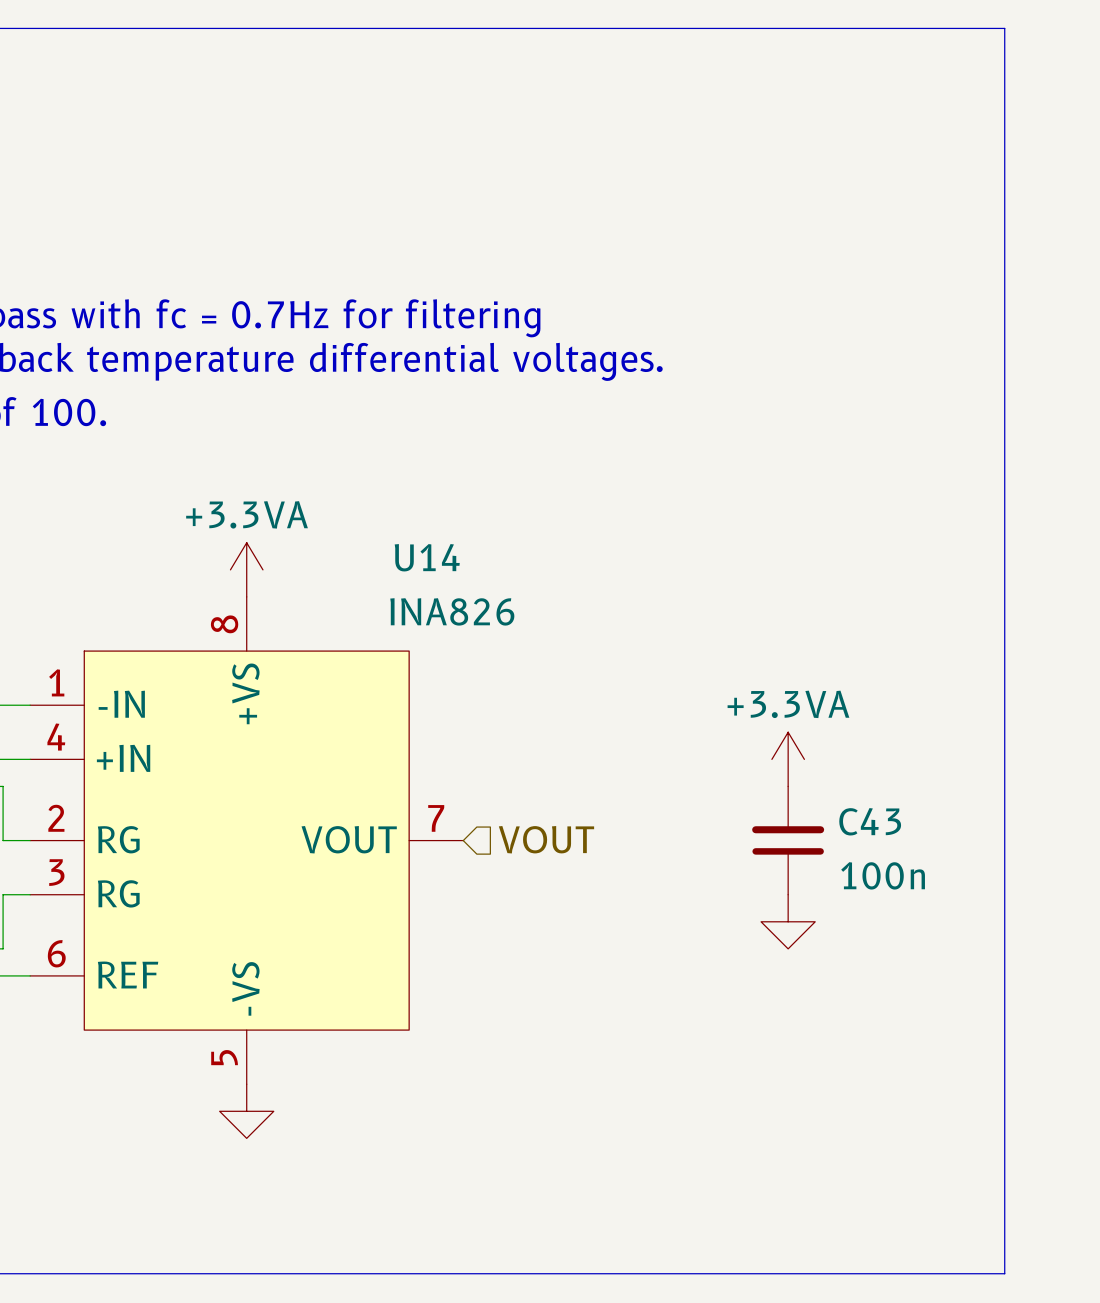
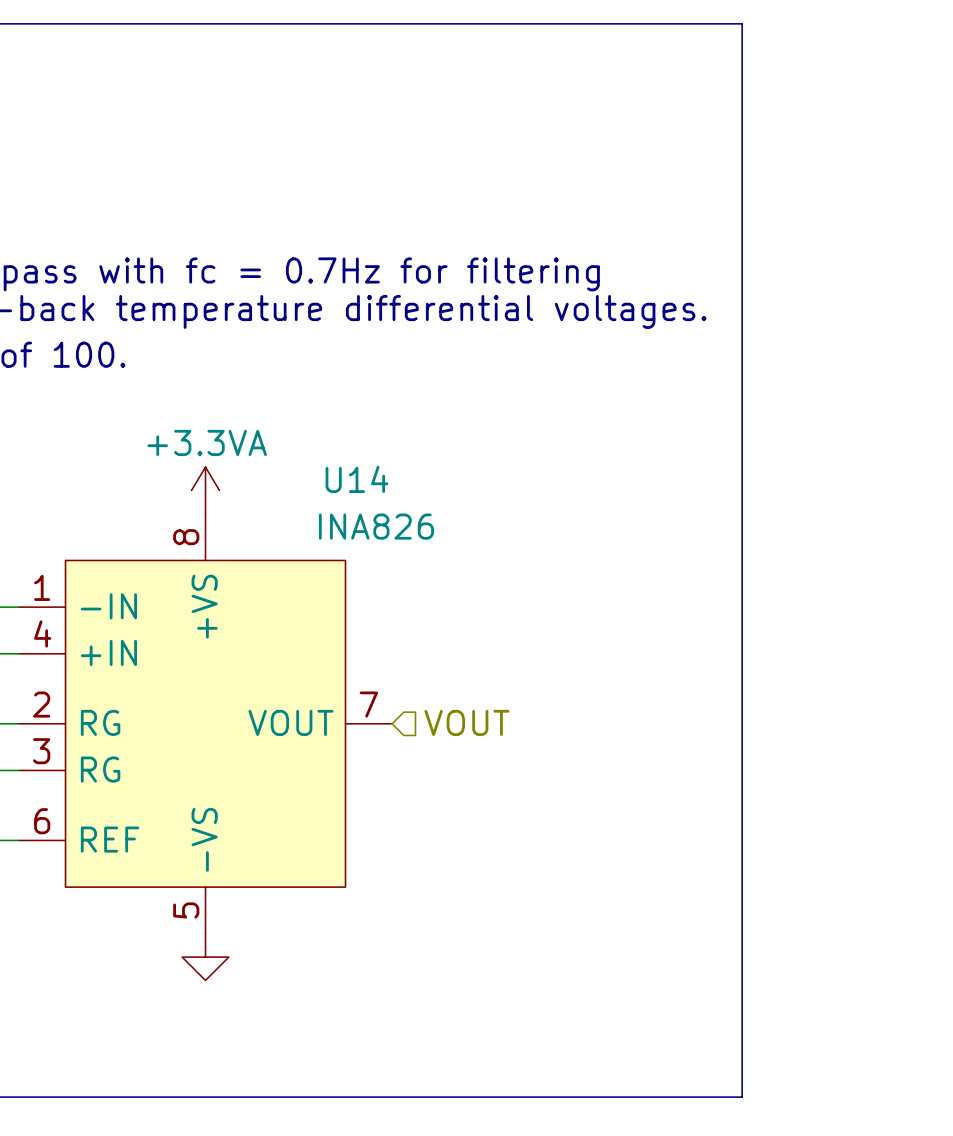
line: (869, 28) (1004, 28) (1004, 1273) (869, 1273) -> (742, 23) (742, 1097)
power symbol: +3.3VA (788, 759) -> none
C43: 100n (788, 840) -> none
power symbol: (788, 921) -> none

